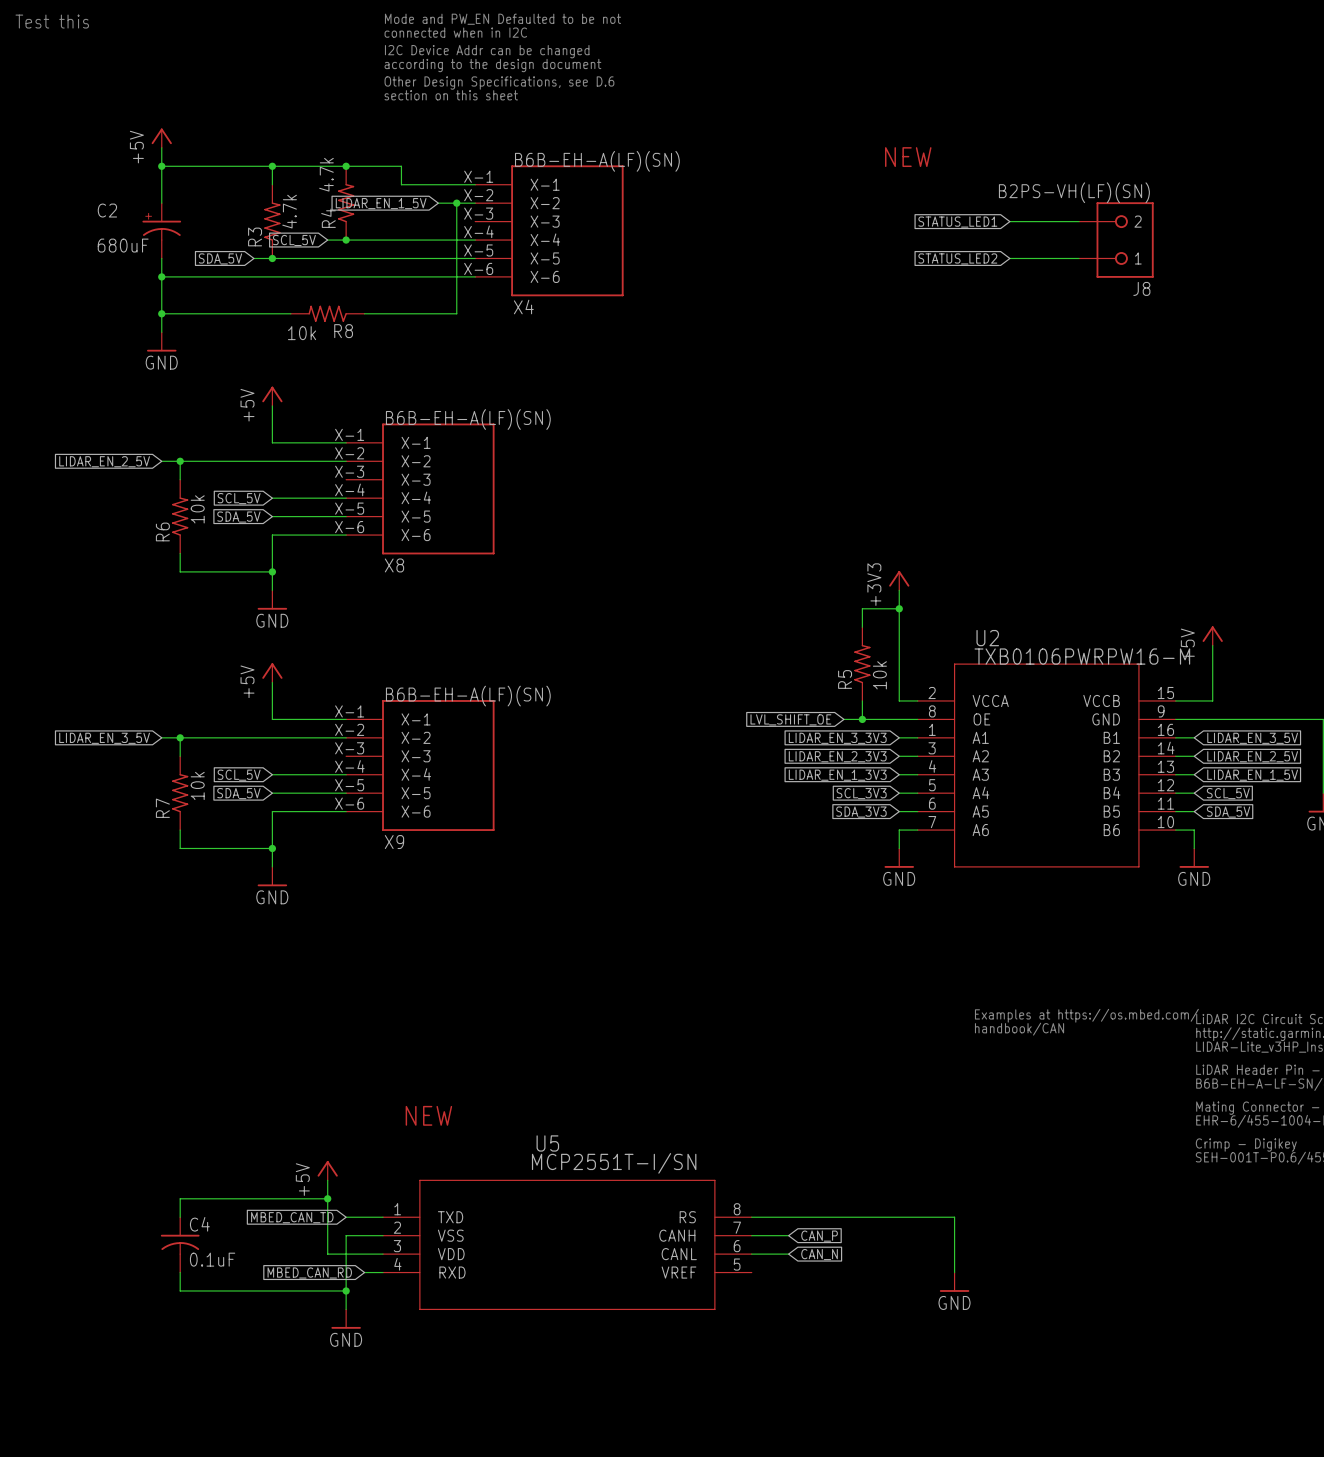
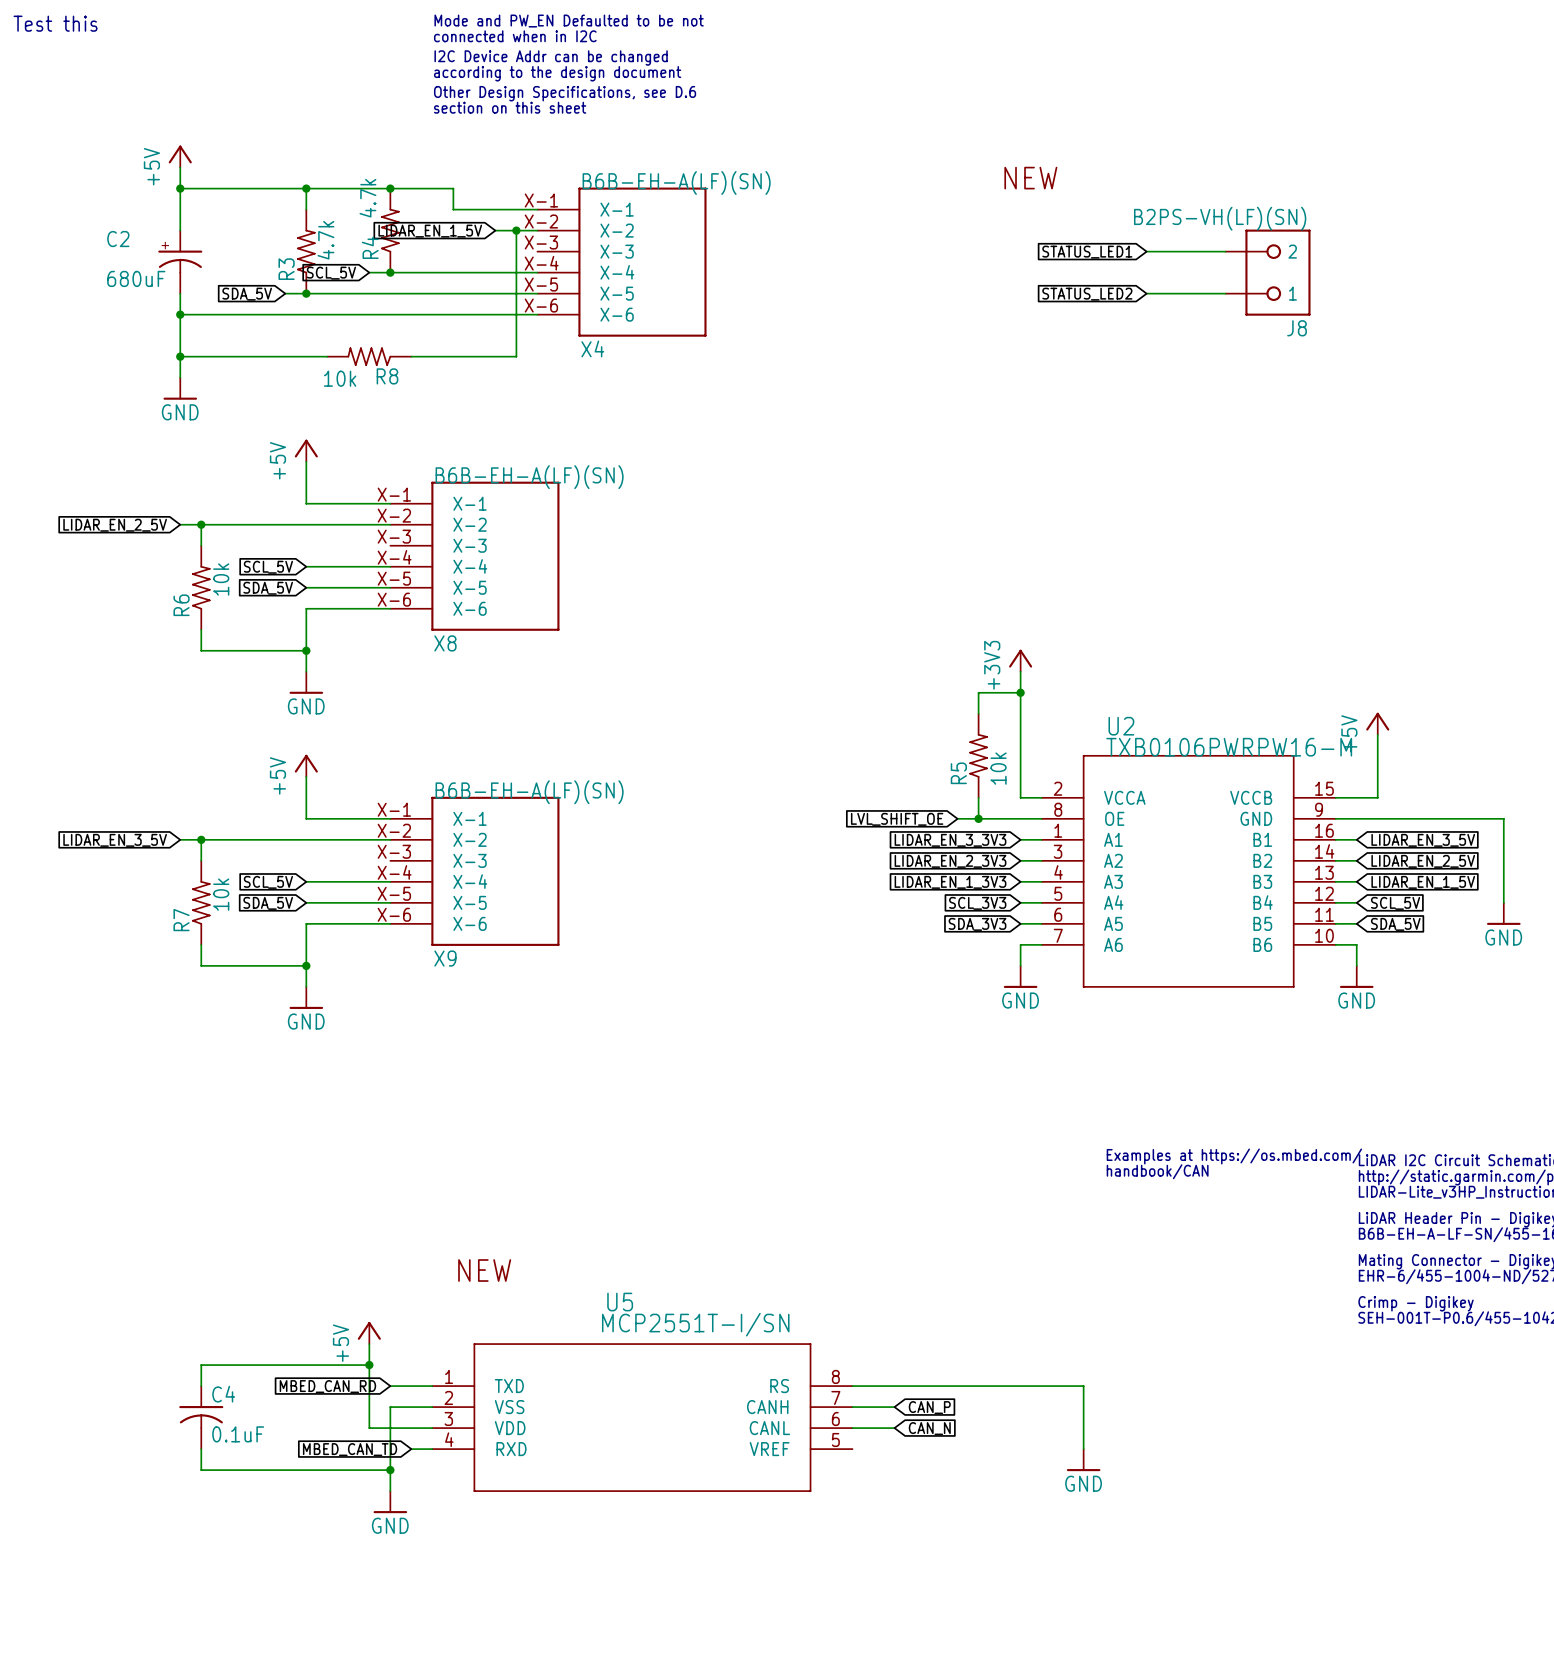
global label: MBED_CAN_TD (292, 1217) -> MBED_CAN_RD (327, 1386)
global label: MBED_CAN_RD (309, 1272) -> MBED_CAN_TD (350, 1449)

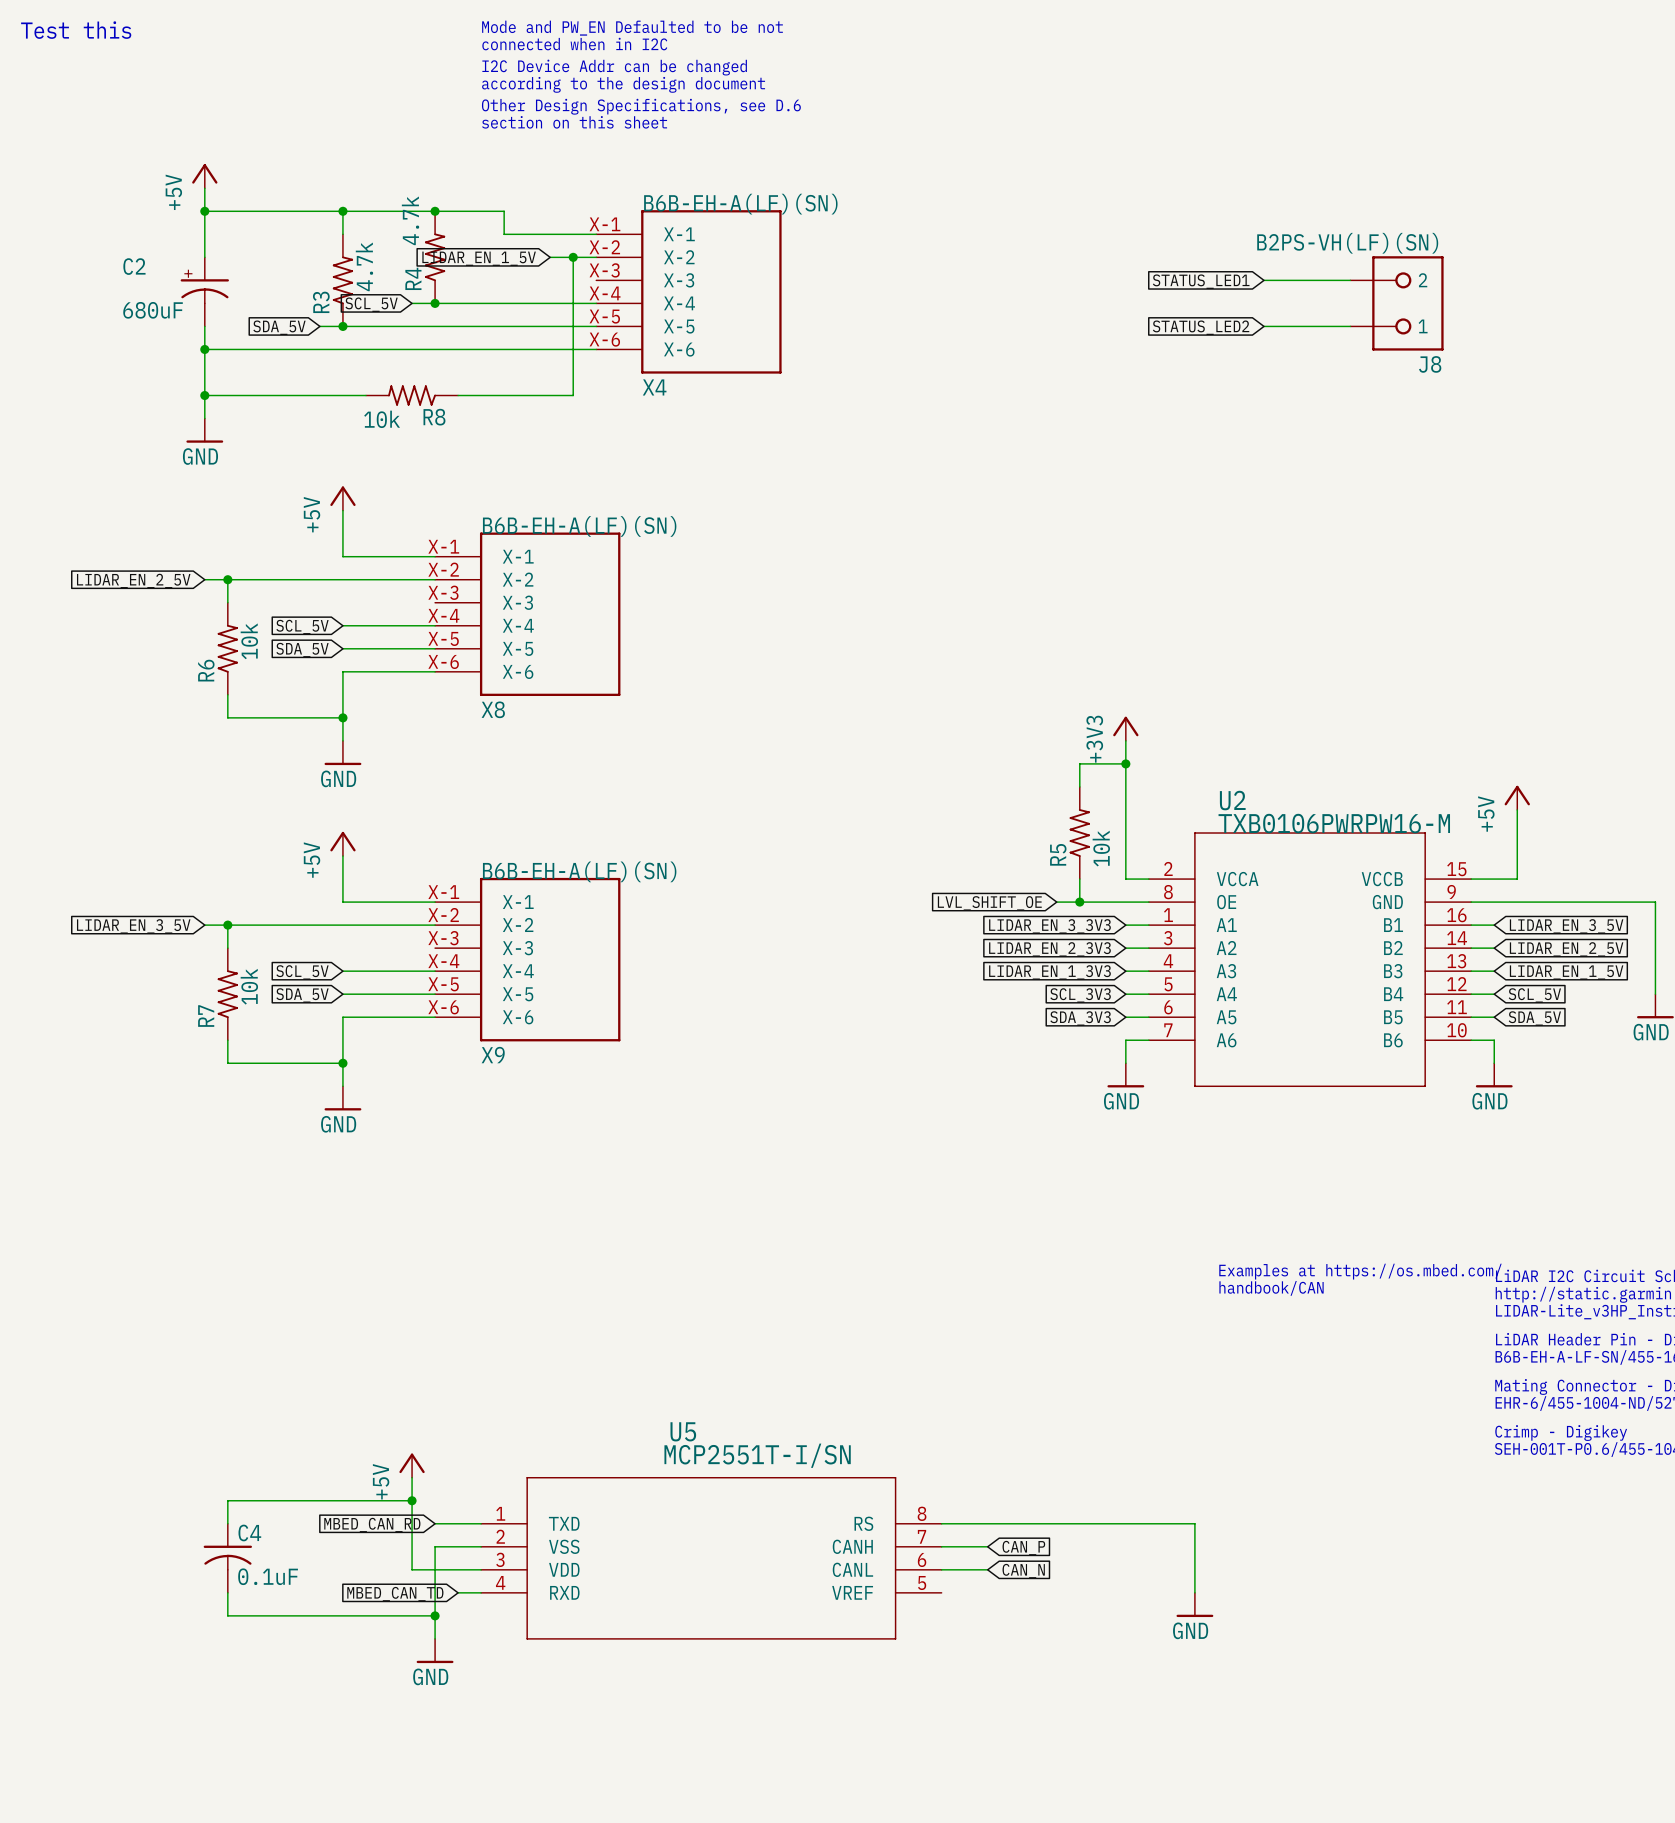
text: NEW (1030, 178) -> none
text: NEW (484, 1270) -> none

